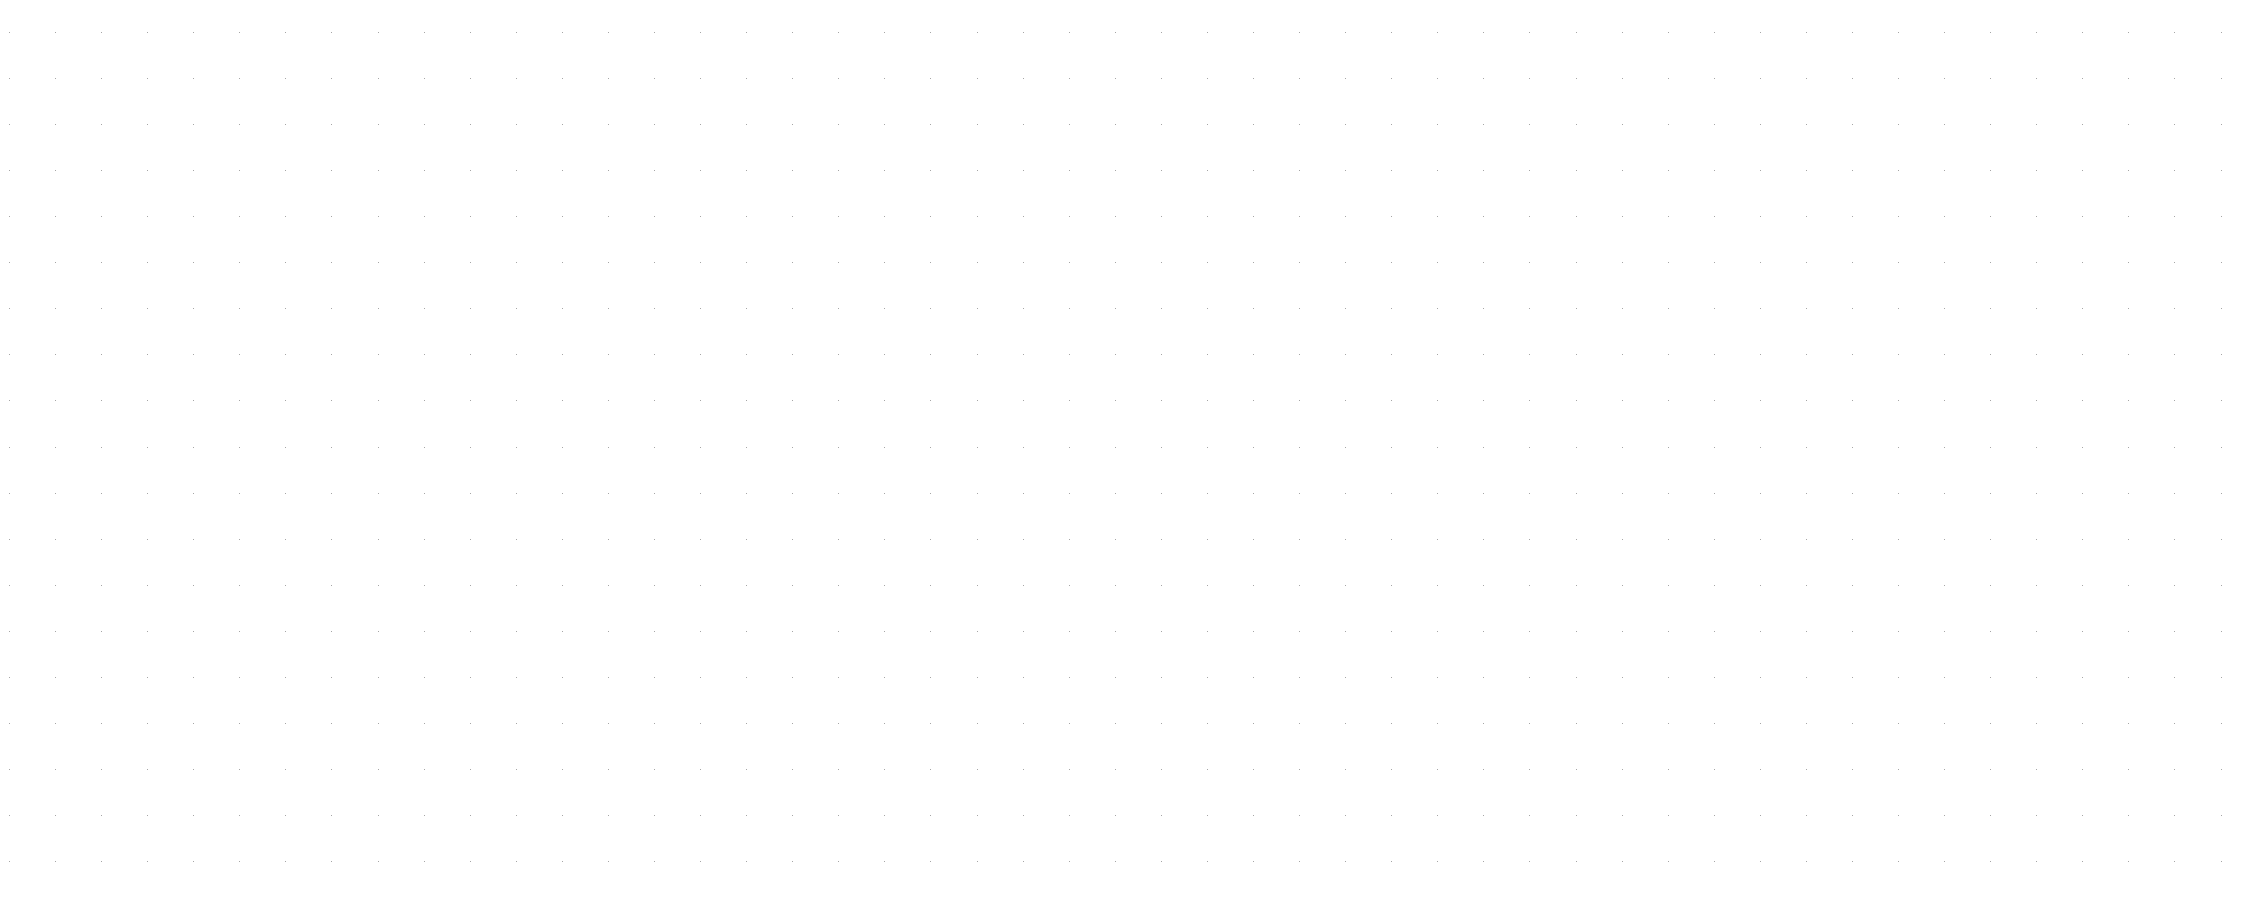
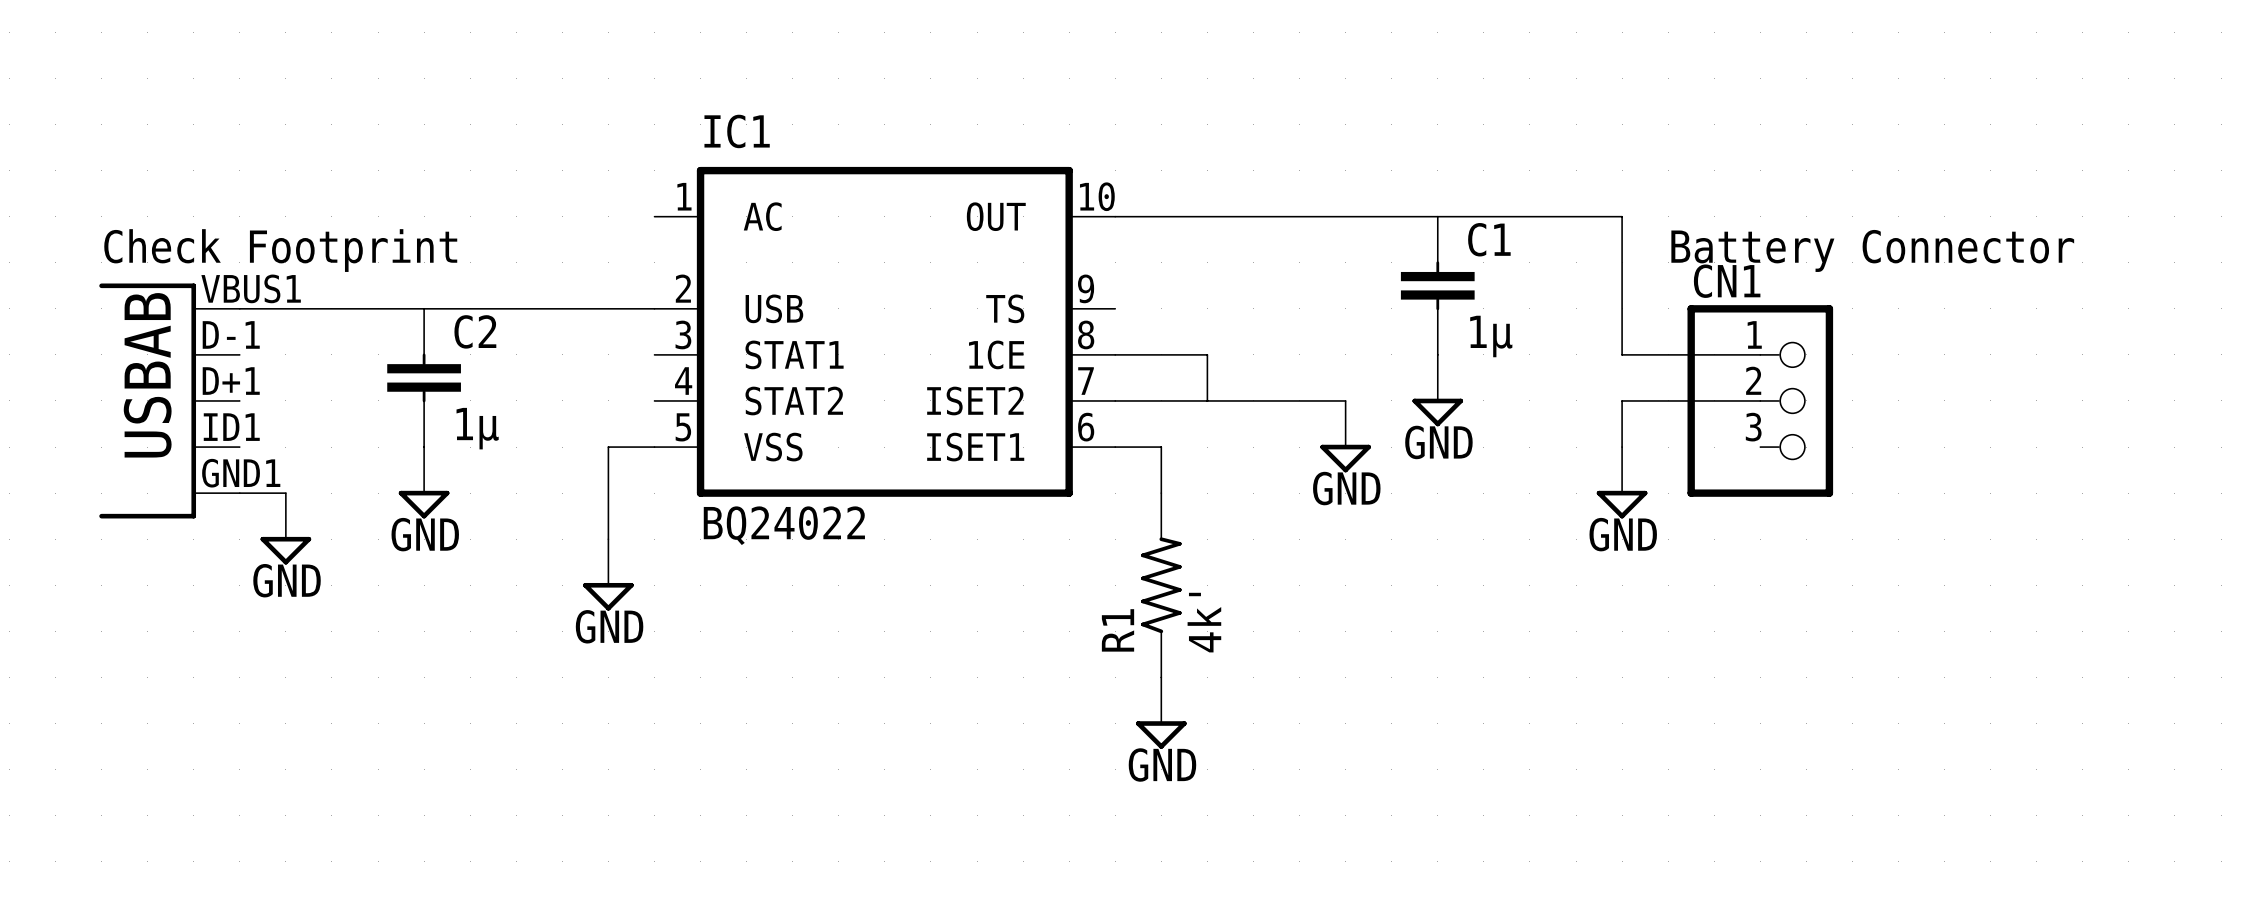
wire: none -> (1115, 216) (1622, 216) (1622, 354) (1760, 354)
text: none -> Check Footprint (280, 250)
text: none -> Battery Connector (1872, 250)
C1: none -> 1µ (1437, 285)
wire: none -> (239, 308) (654, 308)
IC1: none -> BQ24022 (884, 331)
wire: none -> (1115, 354) (1207, 354) (1207, 400)
C2: none -> 1µ (424, 377)
power symbol: none -> GND (1437, 390)
part: none -> (169, 400)
wire: none -> (1115, 400) (1345, 400)
wire: none -> (1760, 400) (1622, 400) (1622, 447)
CN1: none -> (1760, 400)
power symbol: none -> GND (1345, 436)
wire: none -> (654, 447) (608, 447) (608, 539)
wire: none -> (1115, 447) (1161, 447) (1161, 493)
power symbol: none -> GND (424, 482)
power symbol: none -> GND (1622, 482)
wire: none -> (239, 493) (285, 493)
power symbol: none -> GND (285, 528)
power symbol: none -> GND (608, 574)
R1: none -> 4k' (1161, 585)
power symbol: none -> GND (1161, 713)

